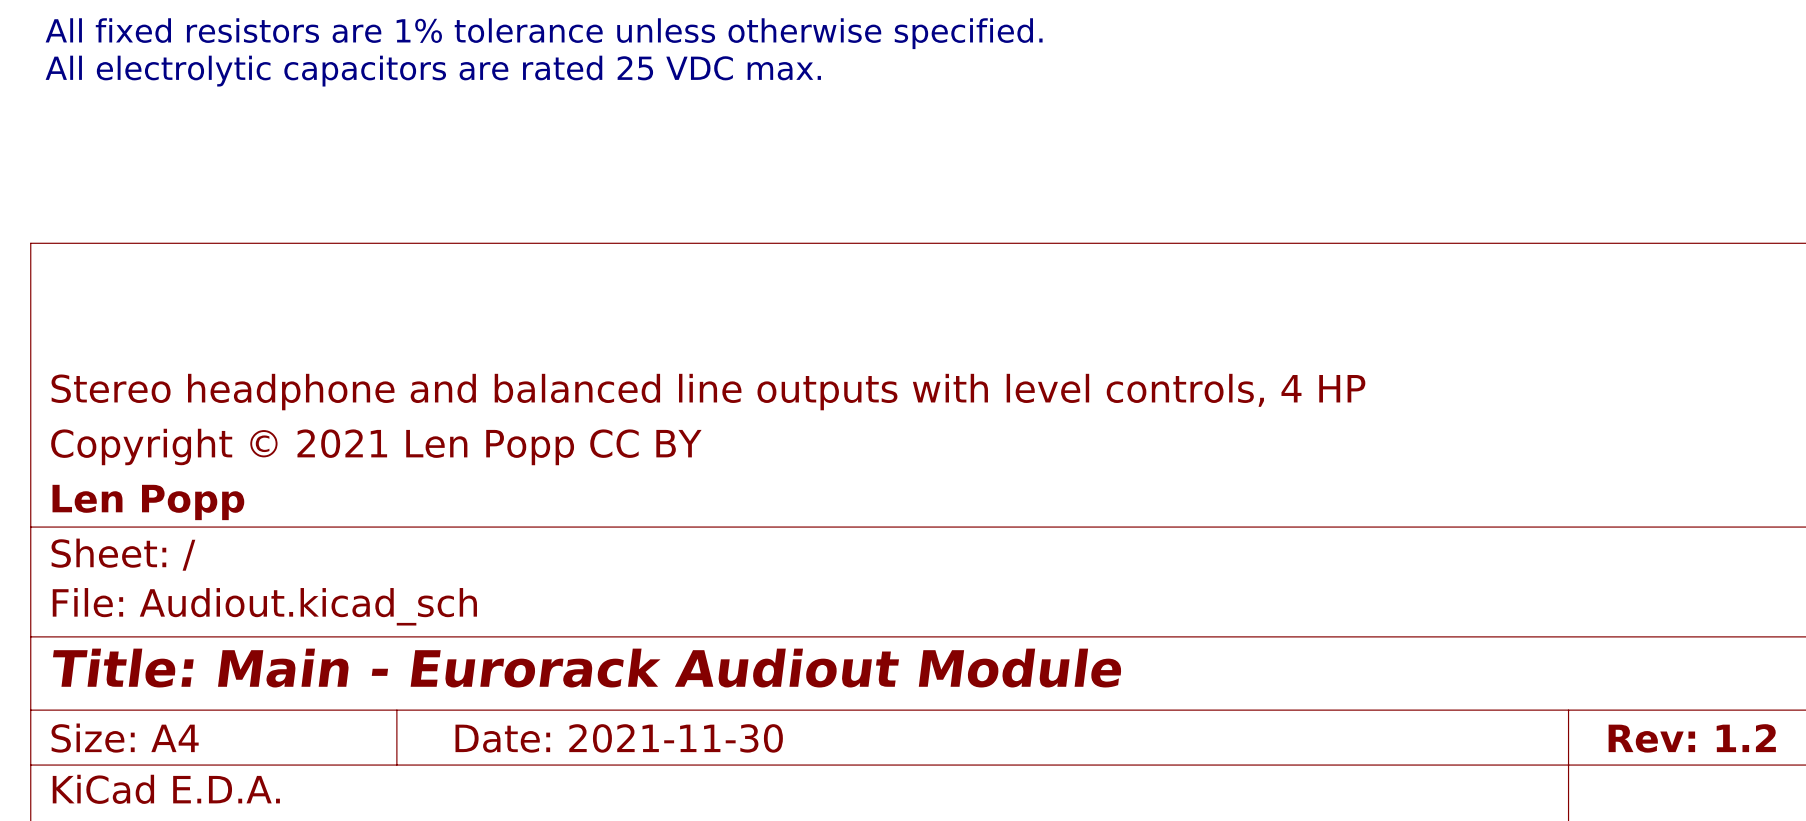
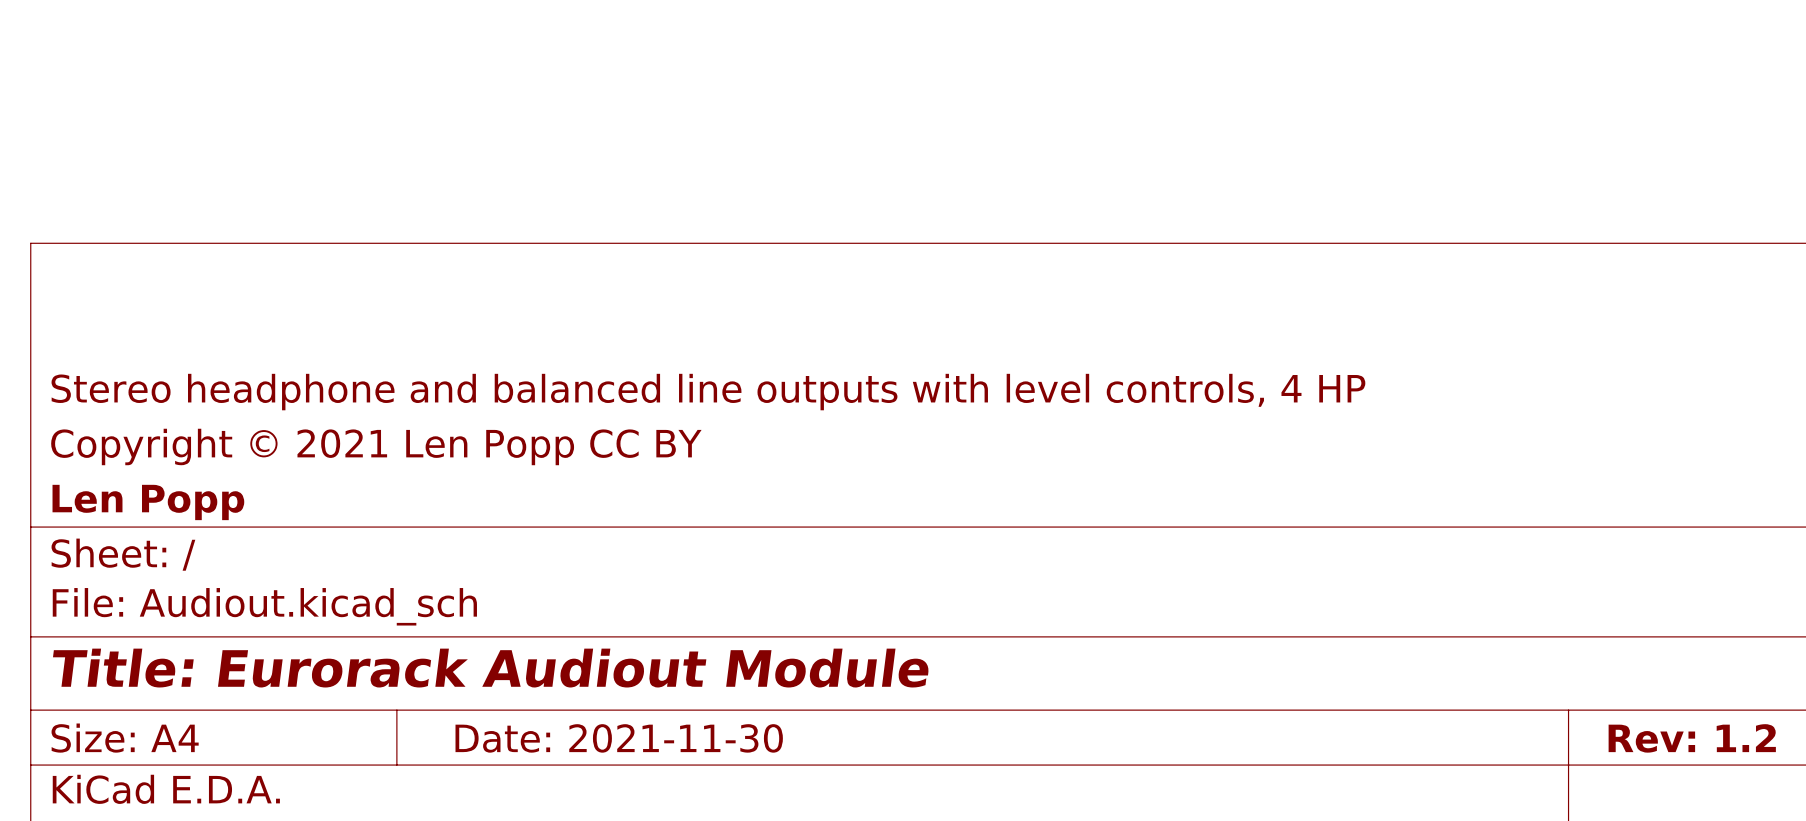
text: All fixed resistors are 1% tolerance unless otherwise specified. (544, 33) -> none
text: All electrolytic capacitors are rated 25 VDC max. (433, 71) -> none
title block: Title: Main - Eurorack Audiout Module (587, 668) -> Title: Eurorack Audiout Module (491, 668)

